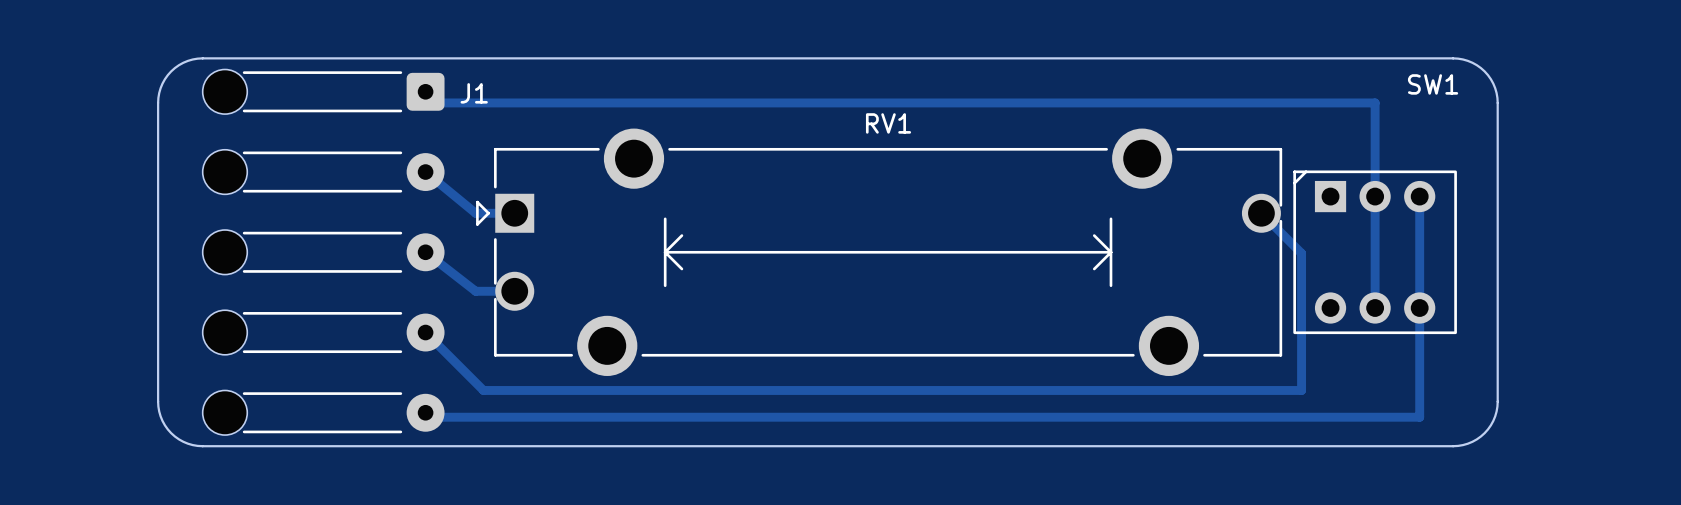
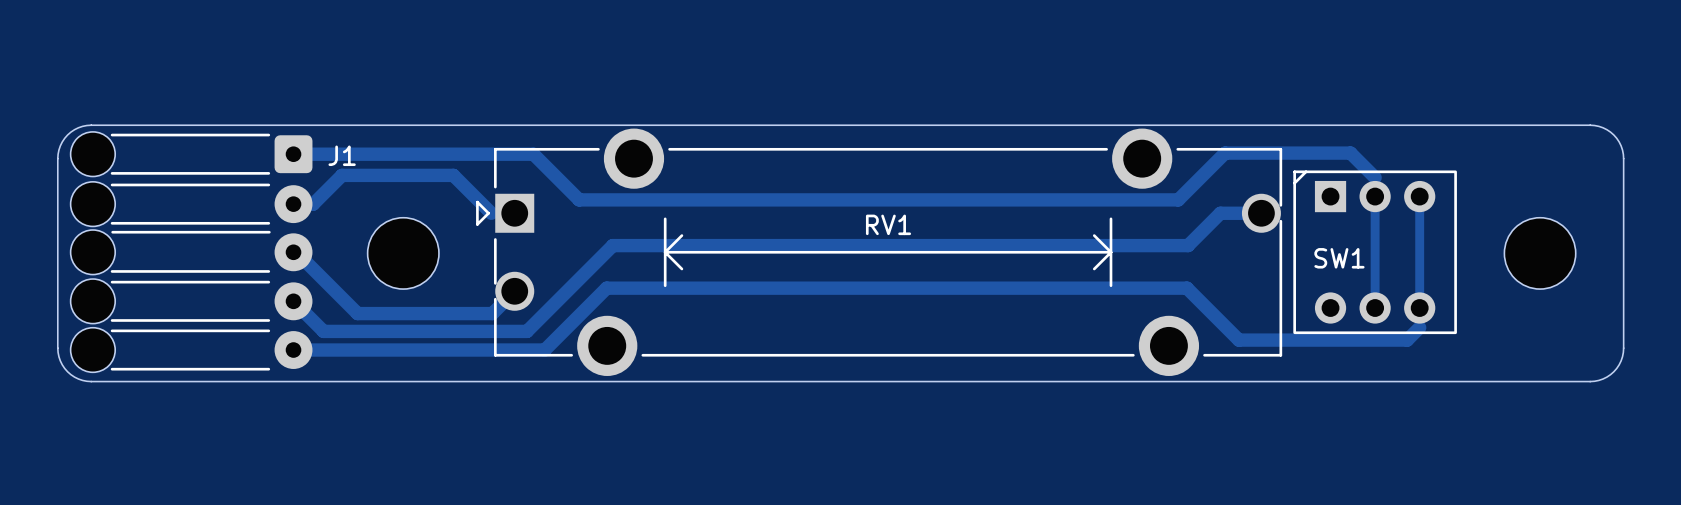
board edge: (202, 58) (1463, 59) (1472, 62) (1484, 71) (1493, 83) (1497, 97) (1496, 411) (1490, 425) (1480, 436) (1467, 443) (1453, 446) (192, 445) (178, 439) (167, 429) (160, 416) (158, 406) (158, 102) (162, 83) (171, 71) (183, 62) (202, 58) -> (91, 125) (78, 127) (67, 135) (60, 145) (57, 158) (58, 352) (60, 360) (67, 371) (78, 379) (86, 381) (1590, 381) (1598, 380) (1610, 374) (1619, 364) (1623, 352) (1623, 154) (1621, 145) (1613, 135) (1606, 129) (1594, 125) (91, 125)
J1 footprint: [202, 69, 445, 436] -> [70, 131, 313, 373]
SW1 name position: SW1 (1433, 84) -> SW1 (1339, 258)
track: (425, 91) (436, 102) (1375, 102) (1375, 177) -> (293, 154) (533, 154) (579, 199) (1178, 199) (1225, 153) (1350, 153) (1375, 177)
J1 name position: J1 (474, 93) -> J1 (342, 155)
RV1 name position: RV1 (888, 123) -> RV1 (888, 224)
track: (425, 172) (475, 213) (491, 213) -> (293, 204) (313, 204) (342, 175) (453, 175) (491, 213)
track: (1261, 213) (1301, 253) (1301, 390) (483, 390) (425, 332) -> (1261, 213) (1220, 213) (1188, 245) (612, 245) (527, 331) (323, 331) (293, 301)
track: (425, 252) (475, 291) (514, 291) -> (293, 252) (296, 252) (357, 313) (492, 313) (514, 291)
part: none -> (403, 253)
part: none -> (1540, 253)
track: (1419, 327) (1419, 417) (430, 417) (425, 412) -> (1419, 327) (1407, 340) (1238, 340) (1186, 288) (606, 288) (544, 350) (293, 350)

